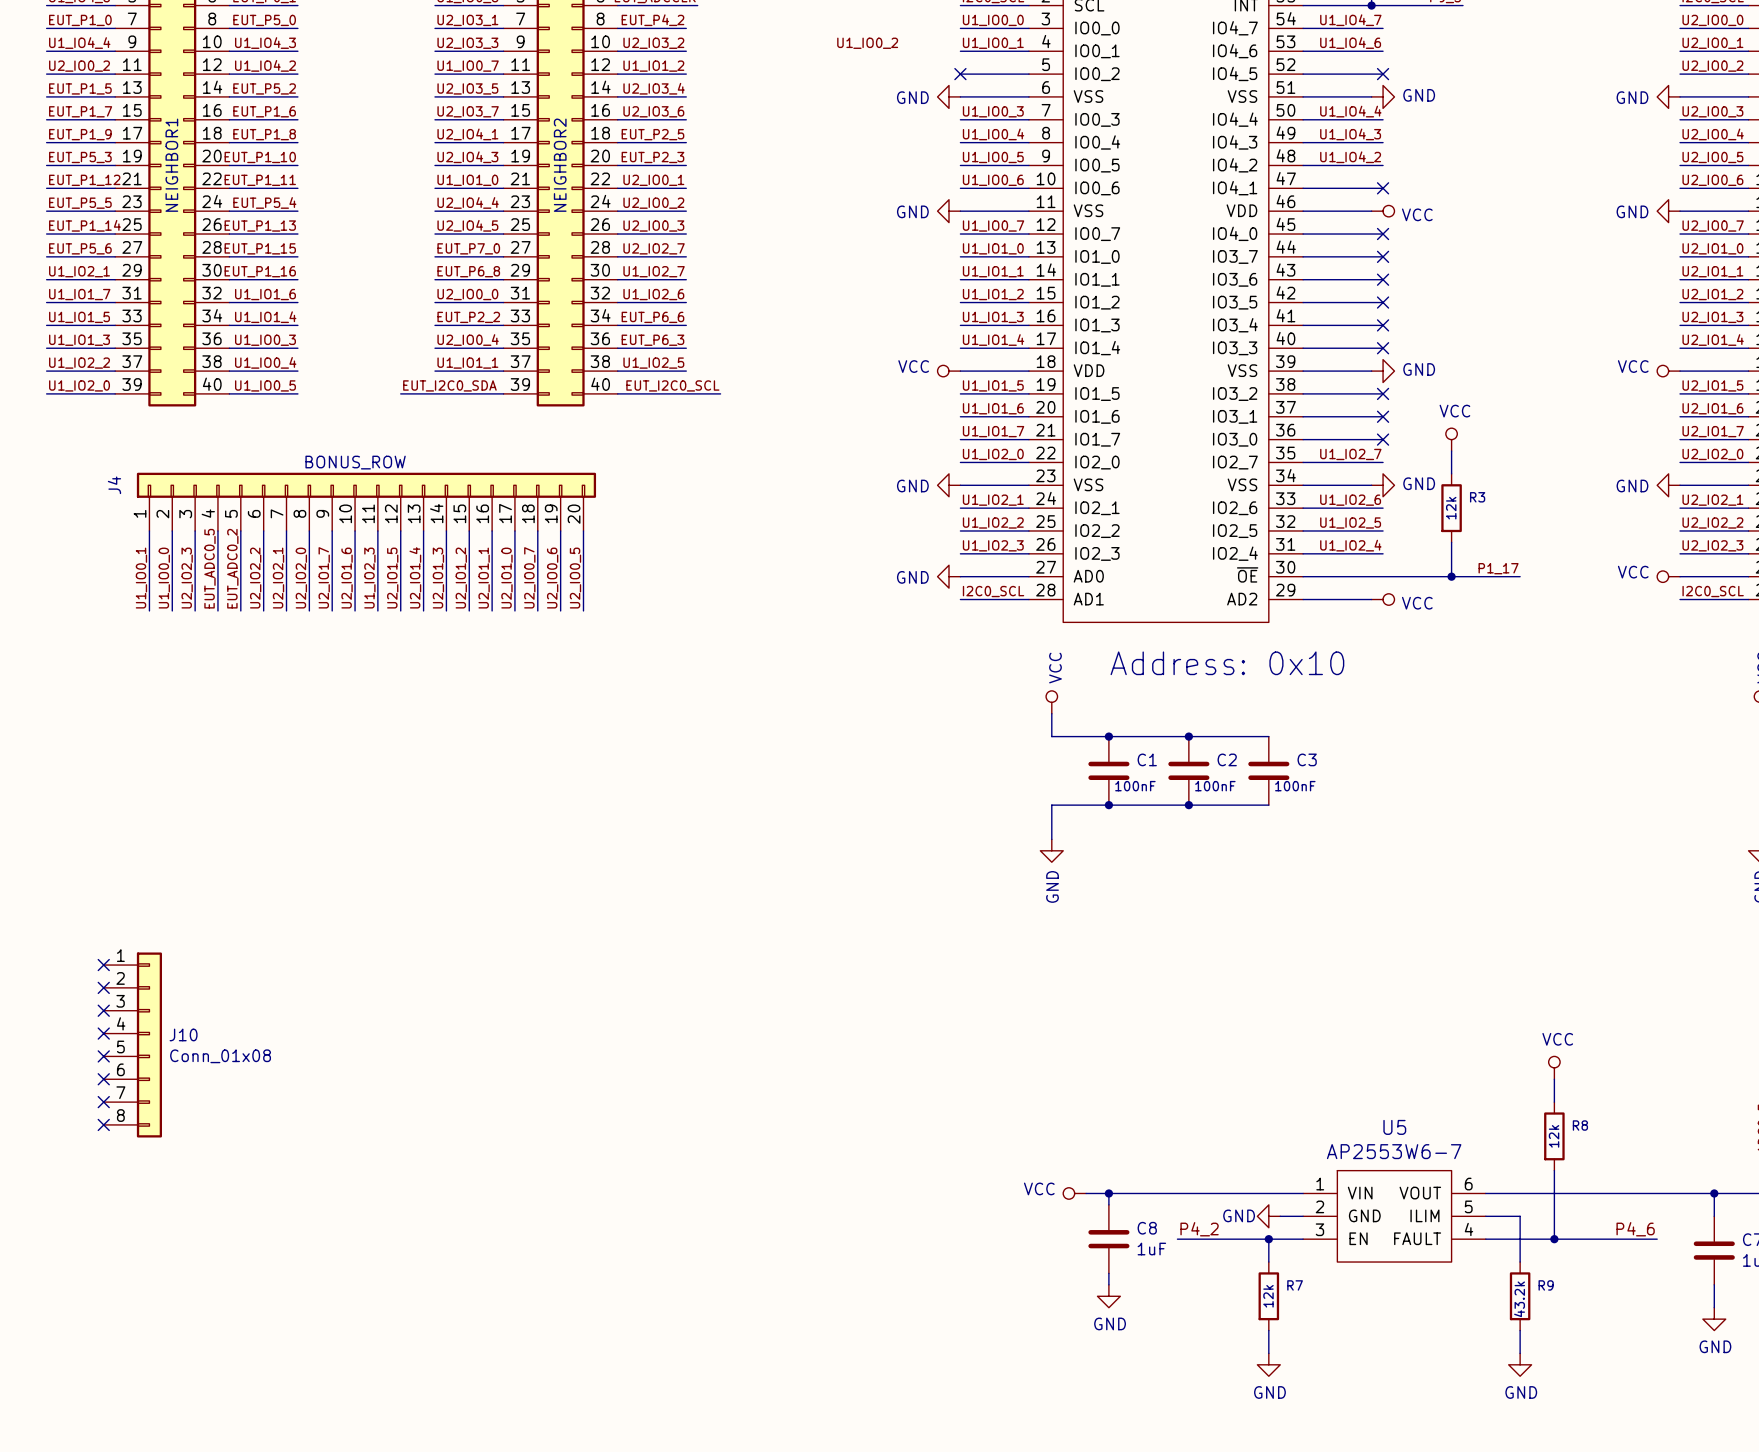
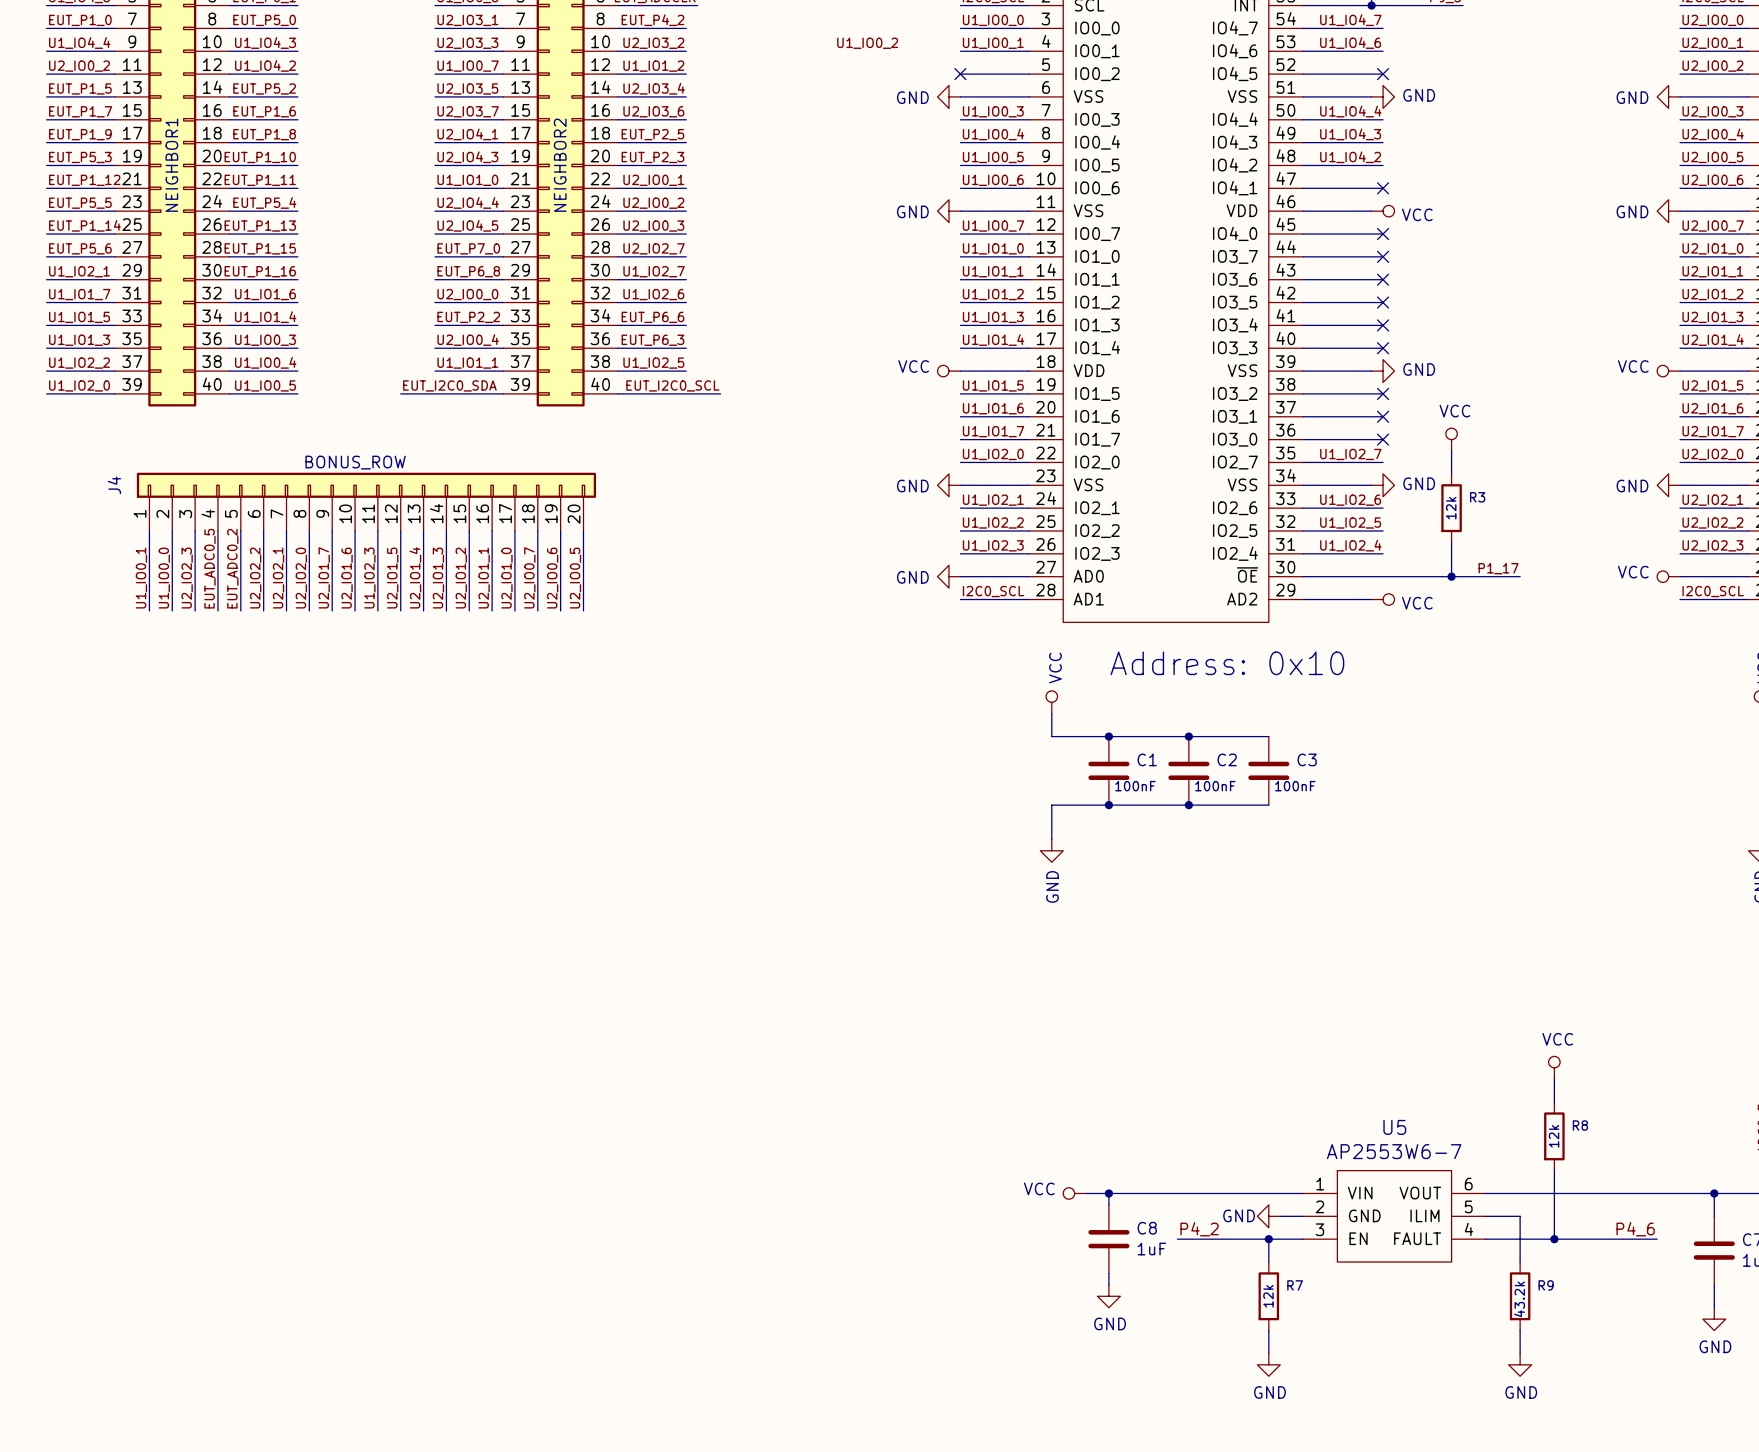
no-connect mark: (103, 965) -> none
no-connect mark: (103, 987) -> none
no-connect mark: (103, 1010) -> none
no-connect mark: (103, 1033) -> none
J10: Conn_01x08 (132, 1044) -> none
no-connect mark: (103, 1056) -> none
no-connect mark: (103, 1079) -> none
no-connect mark: (103, 1102) -> none
no-connect mark: (103, 1124) -> none

